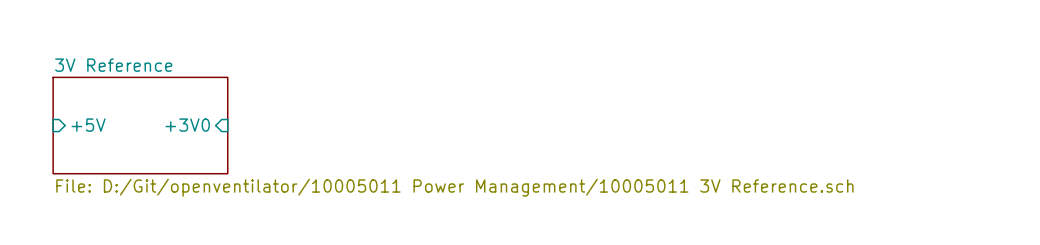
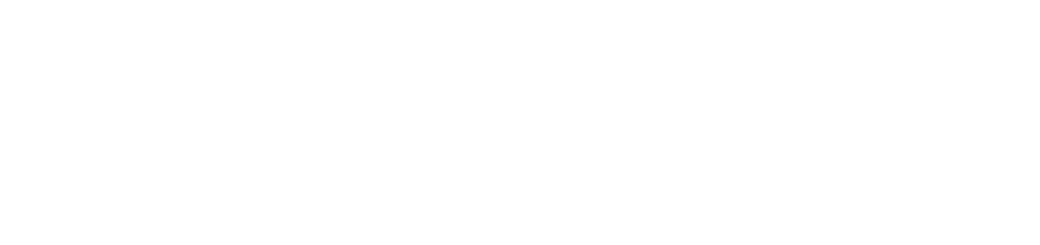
sheet pin: +5V (88, 125) -> none
sheet 3V Reference: File: D:/Git/openventilator/10005011 Power Management/10005011 3V Reference.sch (140, 125) -> none
sheet pin: +3V0 (187, 125) -> none

